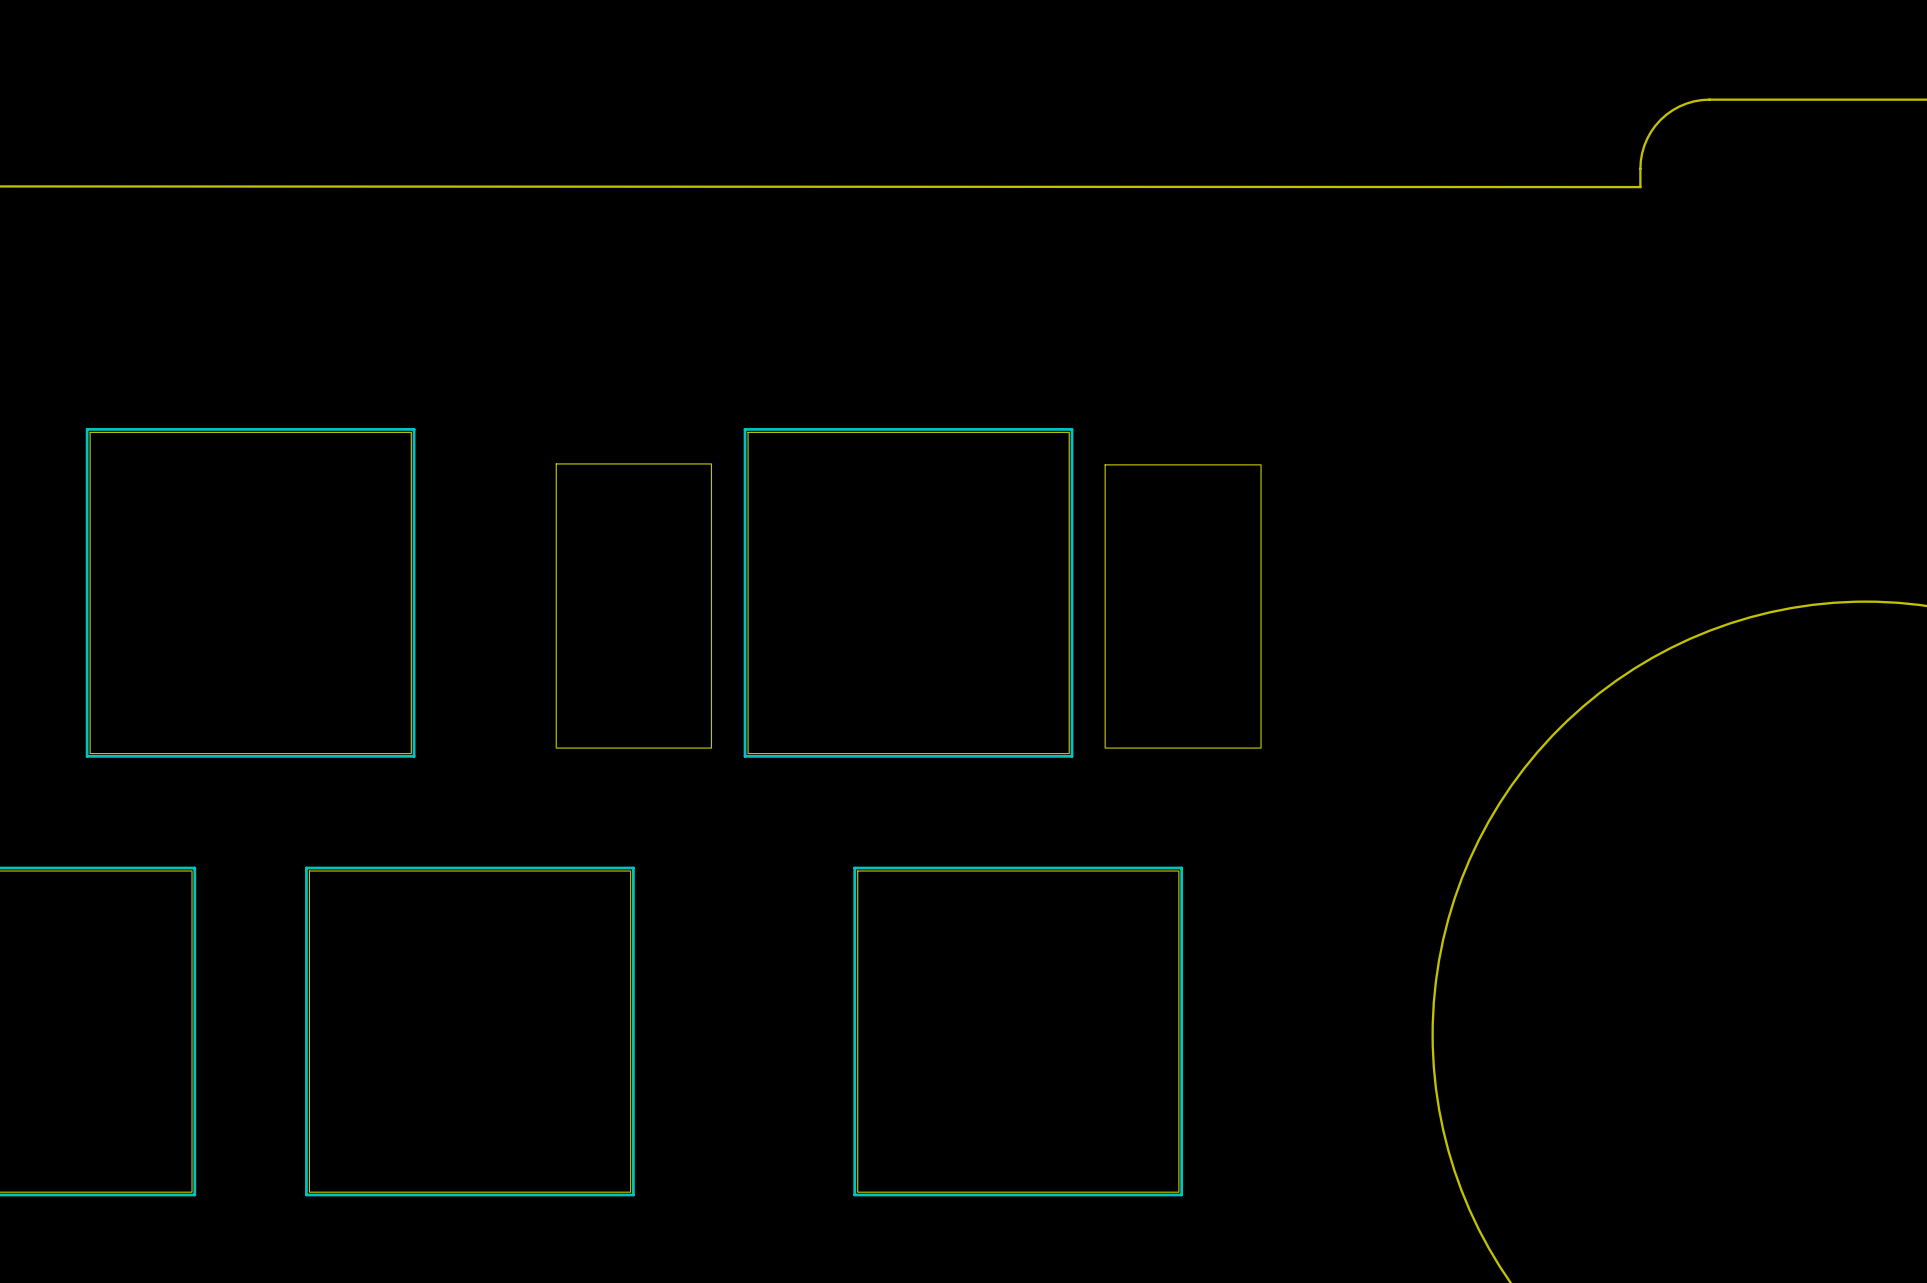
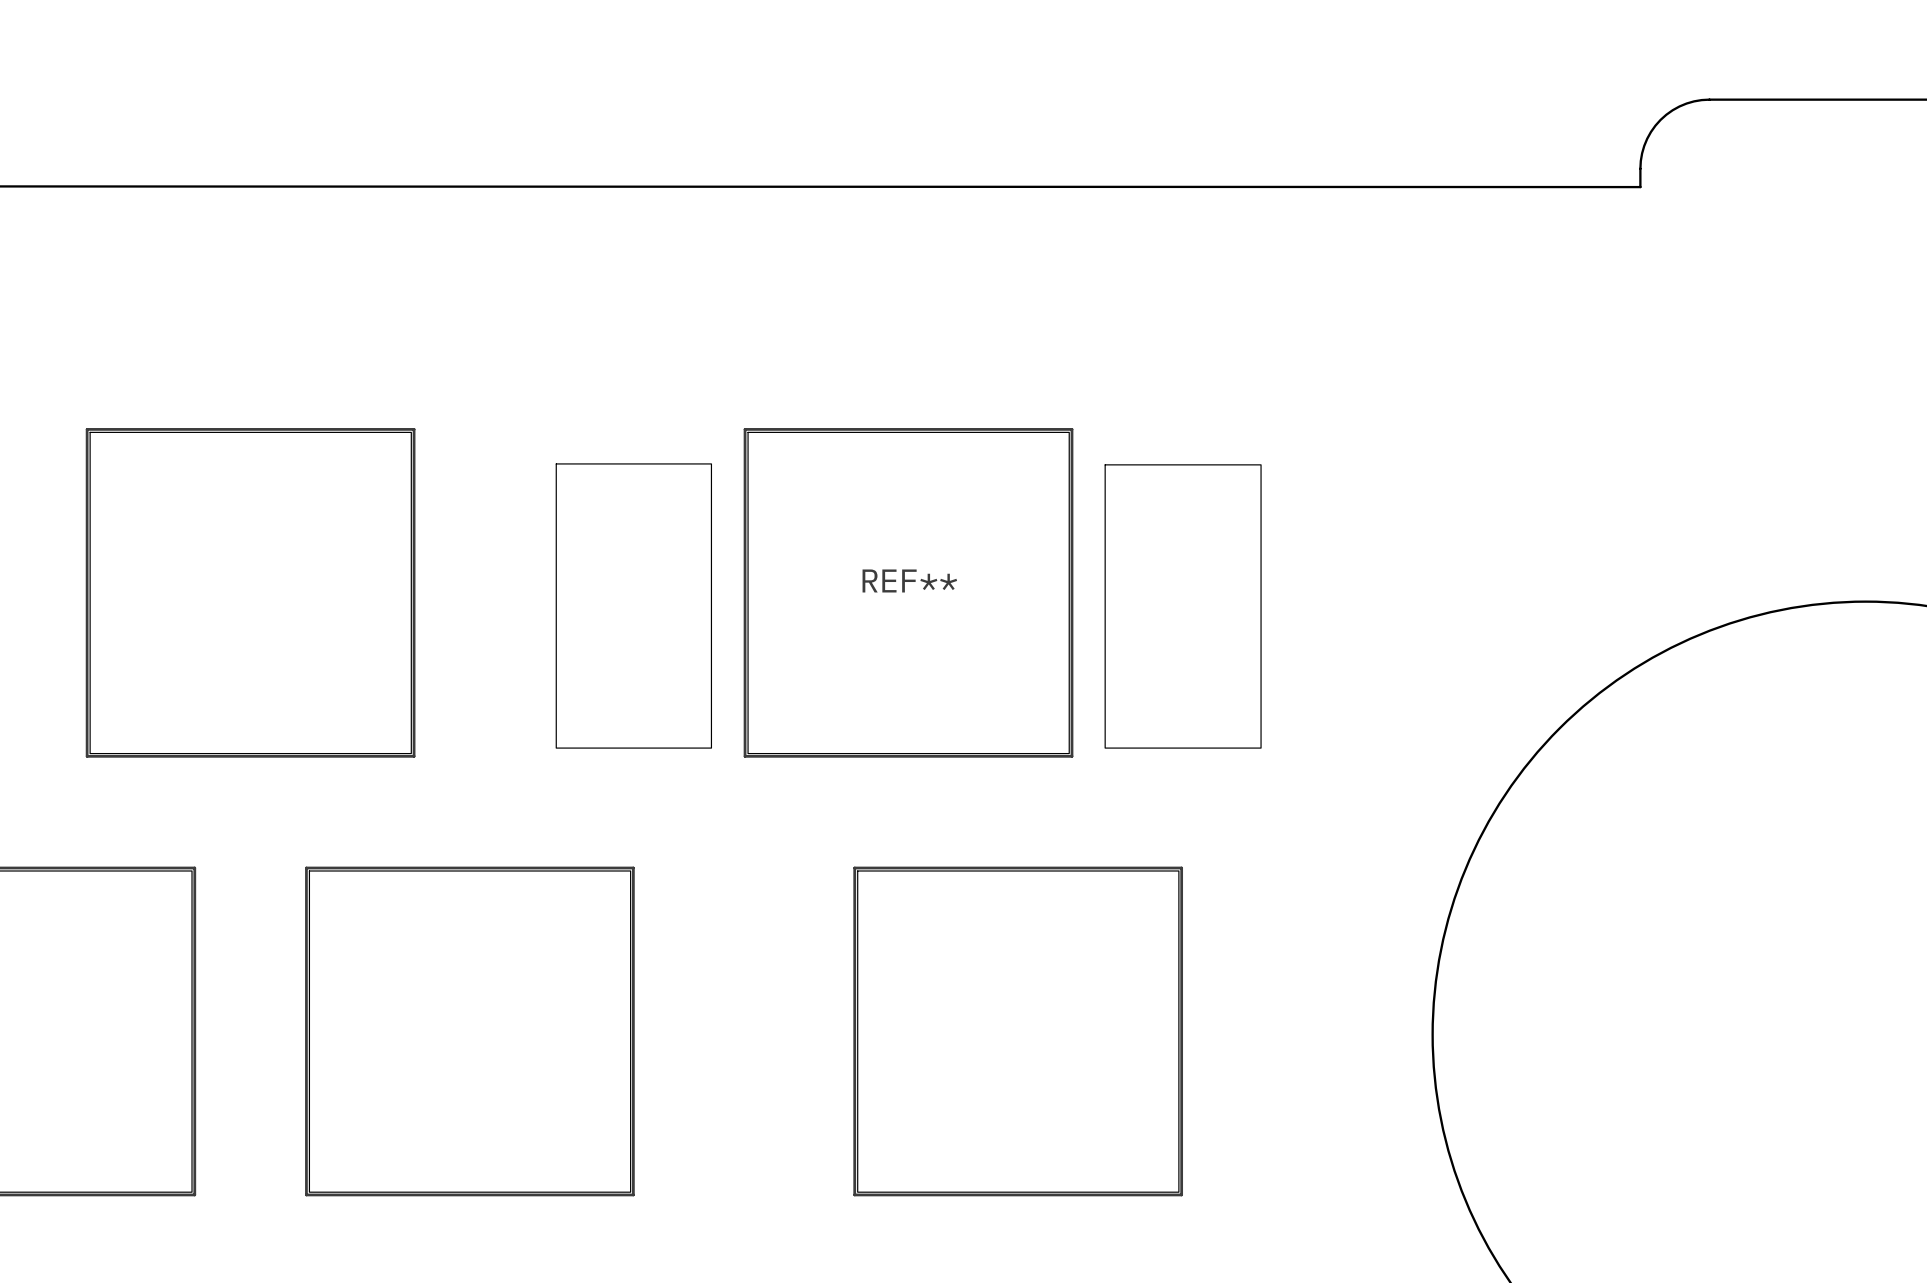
REF**: none -> (908, 606)

